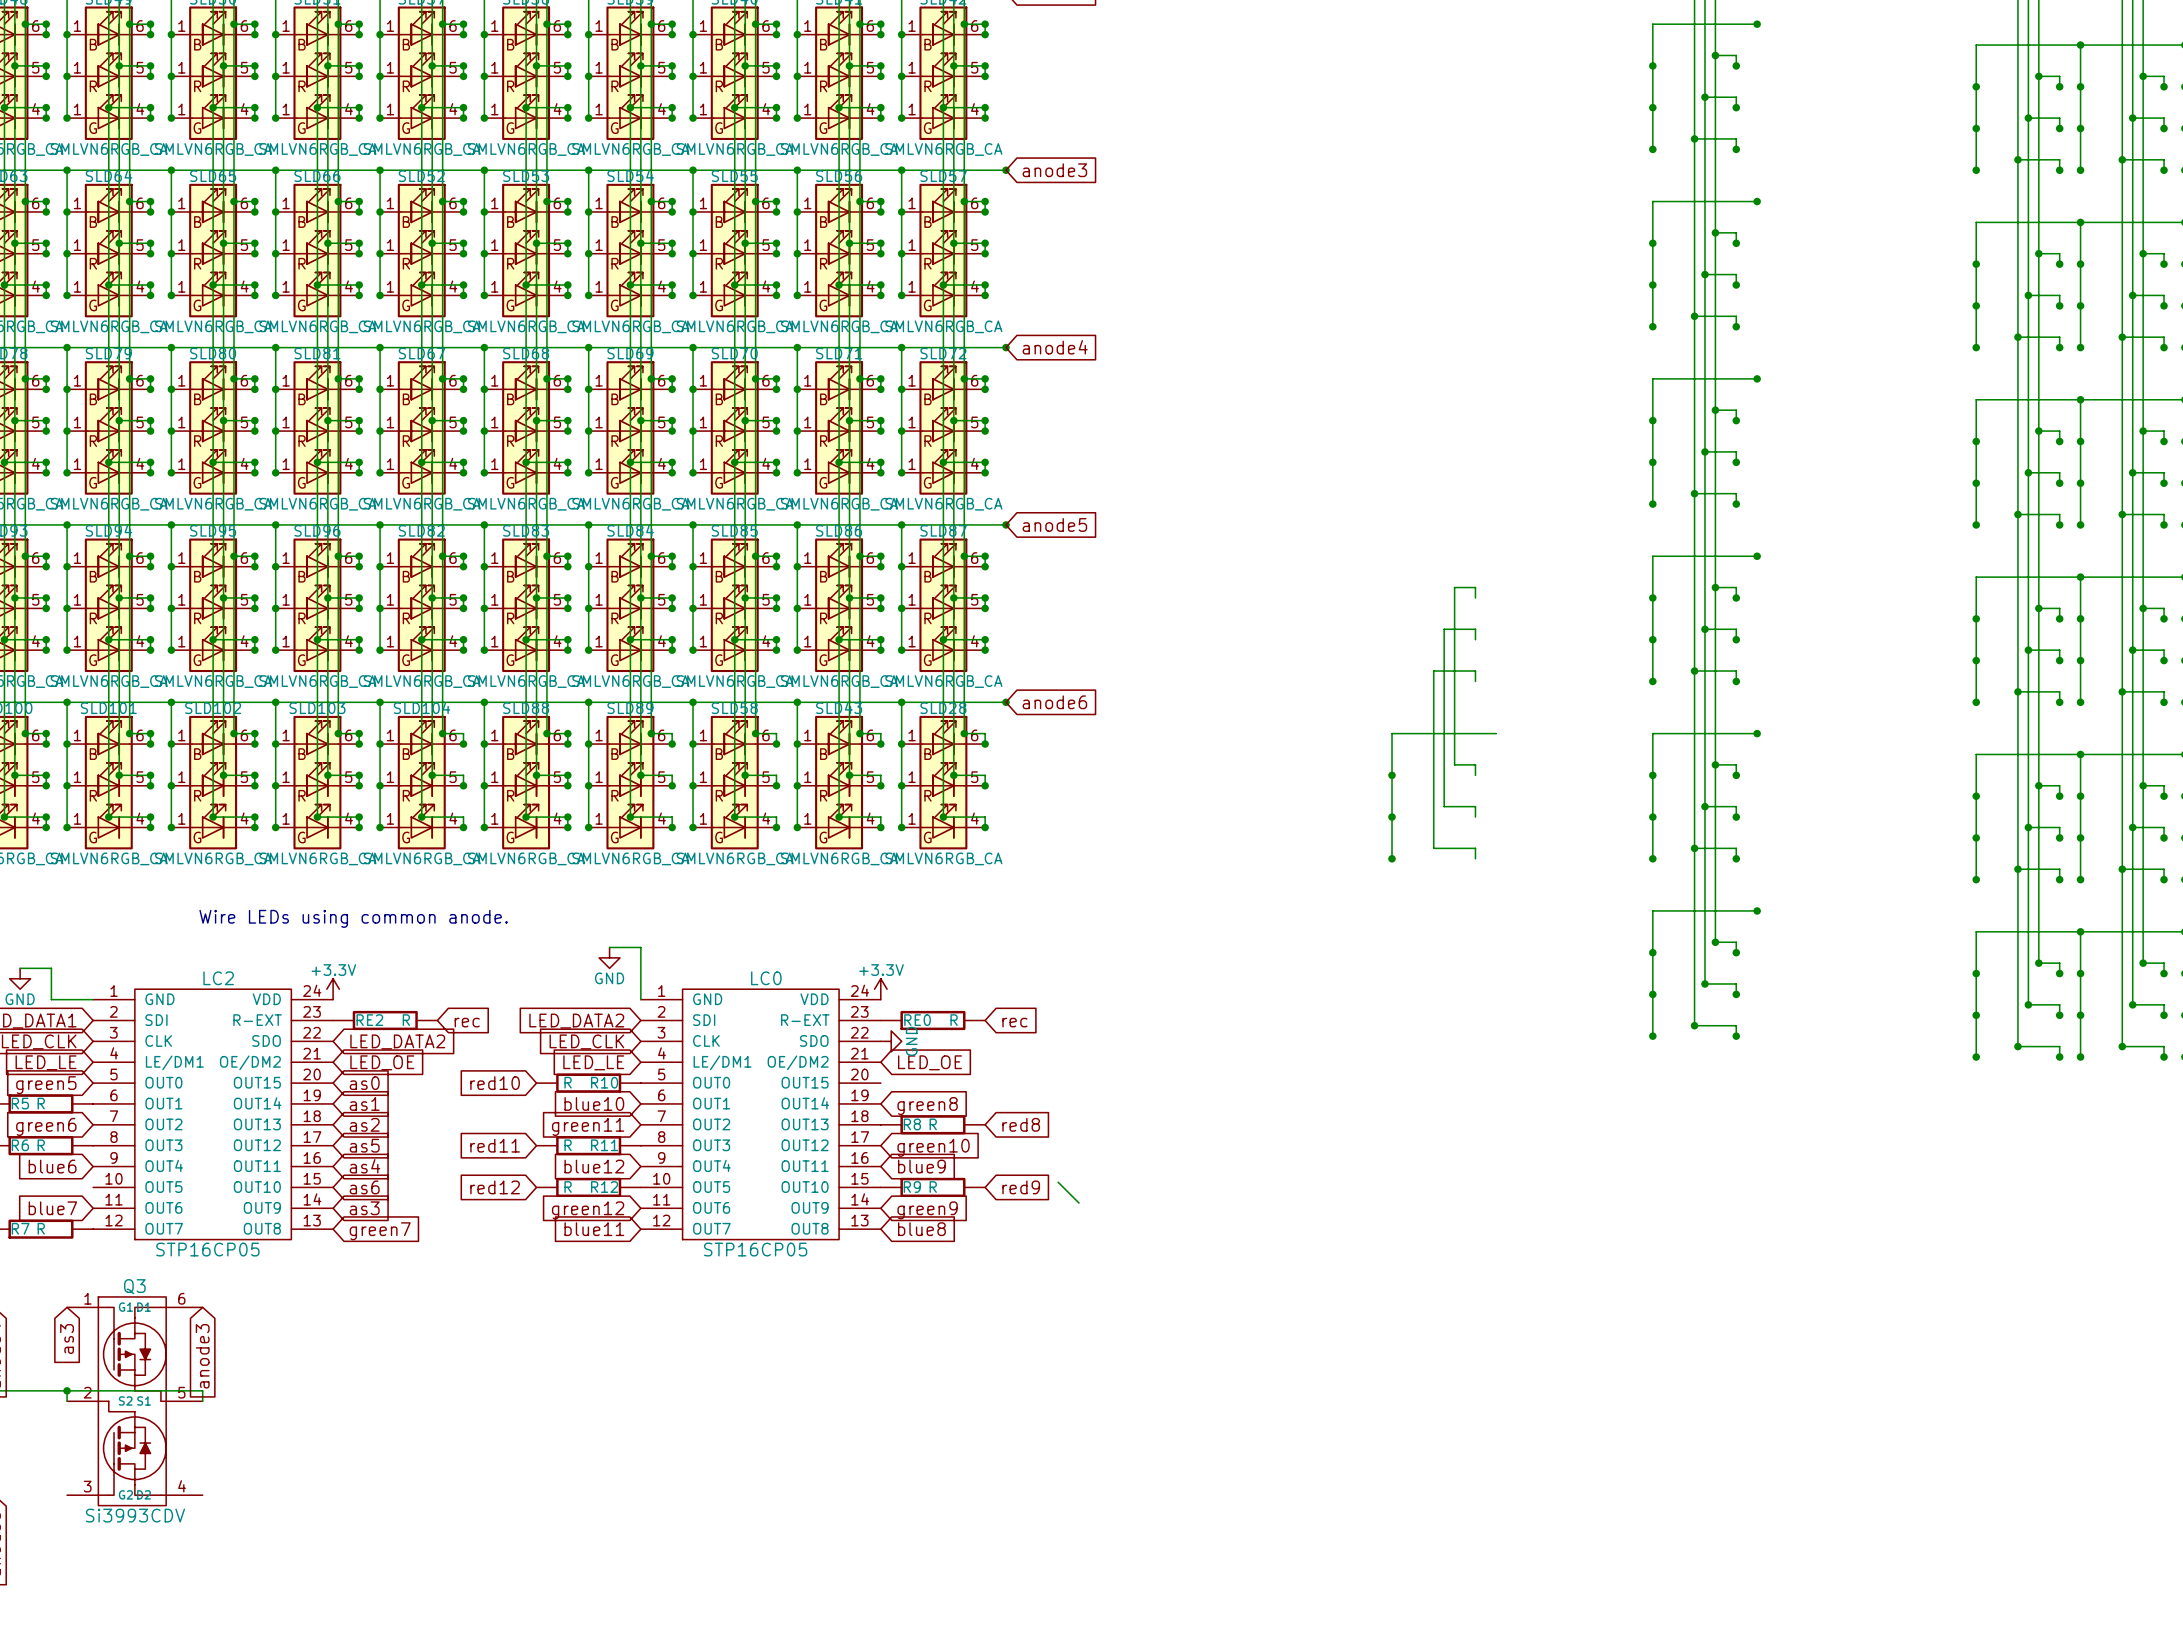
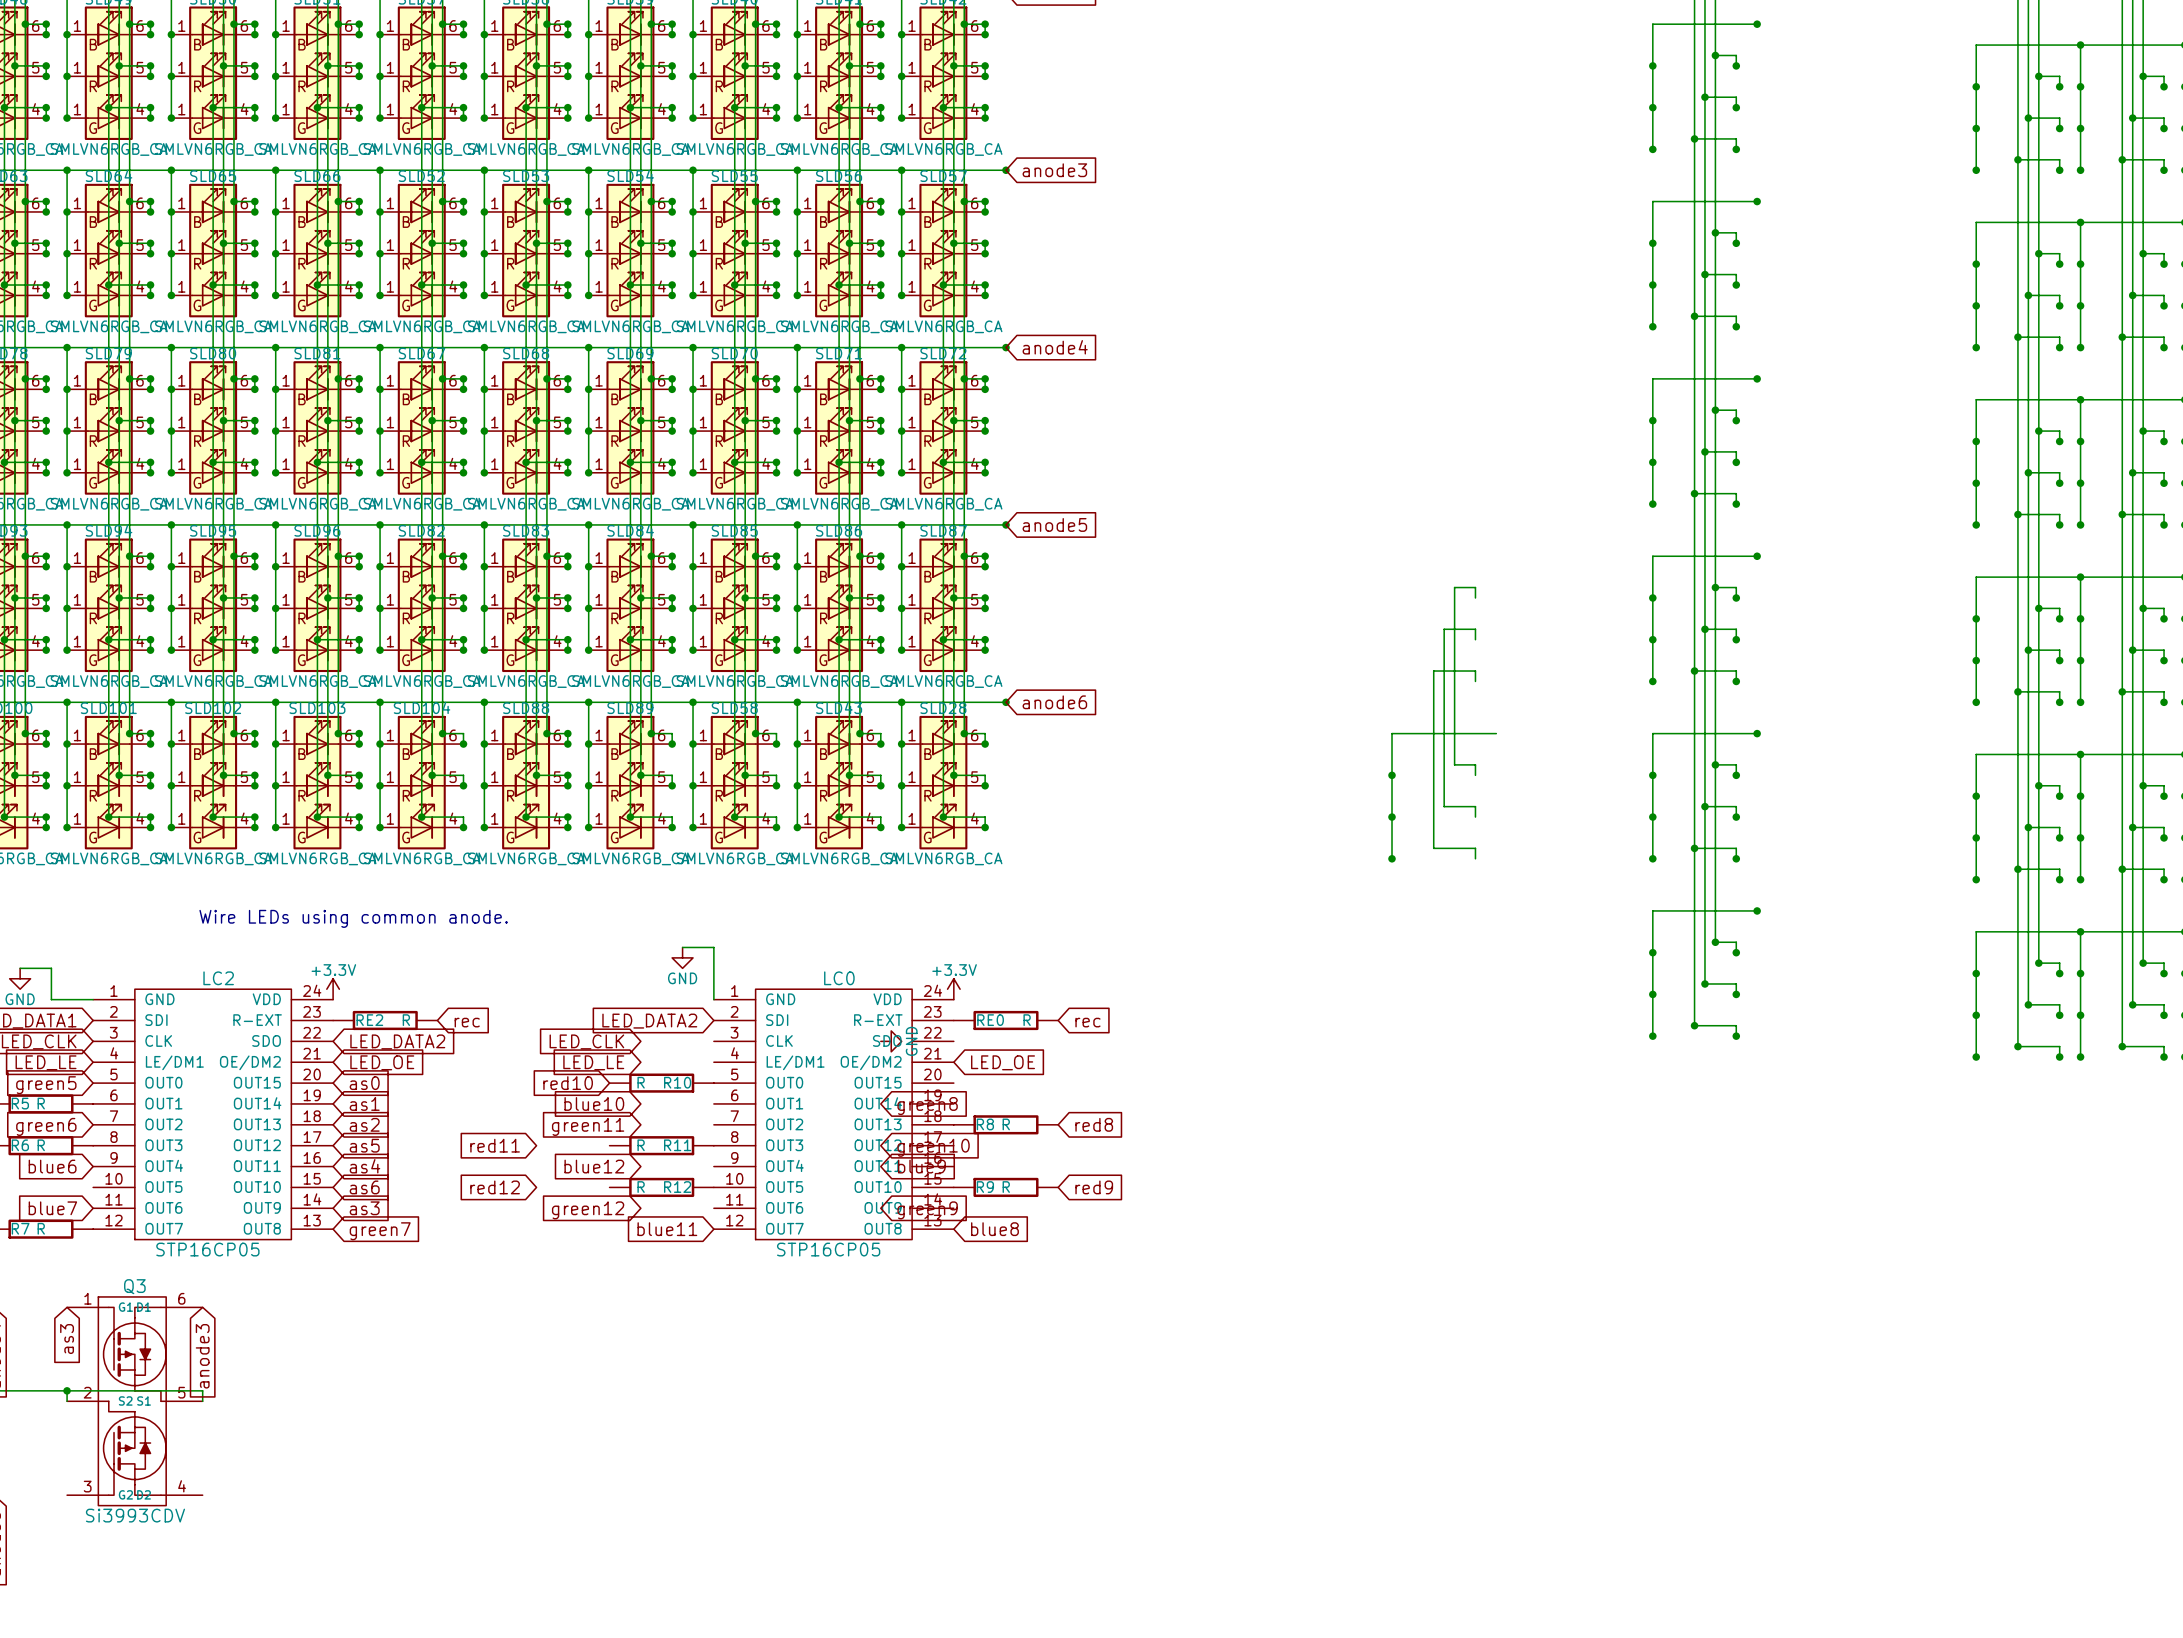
wire: (609, 947) (640, 947) (640, 999) -> (682, 947) (713, 947) (713, 999)
power symbol position: GND (609, 957) -> GND (682, 957)
power symbol position: +3.3V (880, 989) -> +3.3V (953, 989)
RE0 position: (932, 1020) -> (1005, 1020)
global label position: LED_DATA2 (576, 1021) -> LED_DATA2 (649, 1021)
global label position: rec (1014, 1022) -> rec (1087, 1022)
global label position: LED_OE (929, 1062) -> LED_OE (1003, 1062)
global label position: red10 (495, 1083) -> red10 (568, 1083)
R10 position: (588, 1083) -> (661, 1083)
LC0 position: (760, 1114) -> (833, 1114)
R8 position: (932, 1124) -> (1005, 1124)
global label position: red8 (1021, 1124) -> red8 (1094, 1124)
R11 position: (588, 1145) -> (661, 1145)
wire: (1058, 1182) (1079, 1203) -> none
R12 position: (588, 1187) -> (661, 1187)
R9 position: (932, 1187) -> (1005, 1187)
global label position: red9 (1021, 1187) -> red9 (1094, 1187)
global label position: blue11 (594, 1229) -> blue11 (667, 1229)
global label position: blue8 (921, 1229) -> blue8 (994, 1229)

